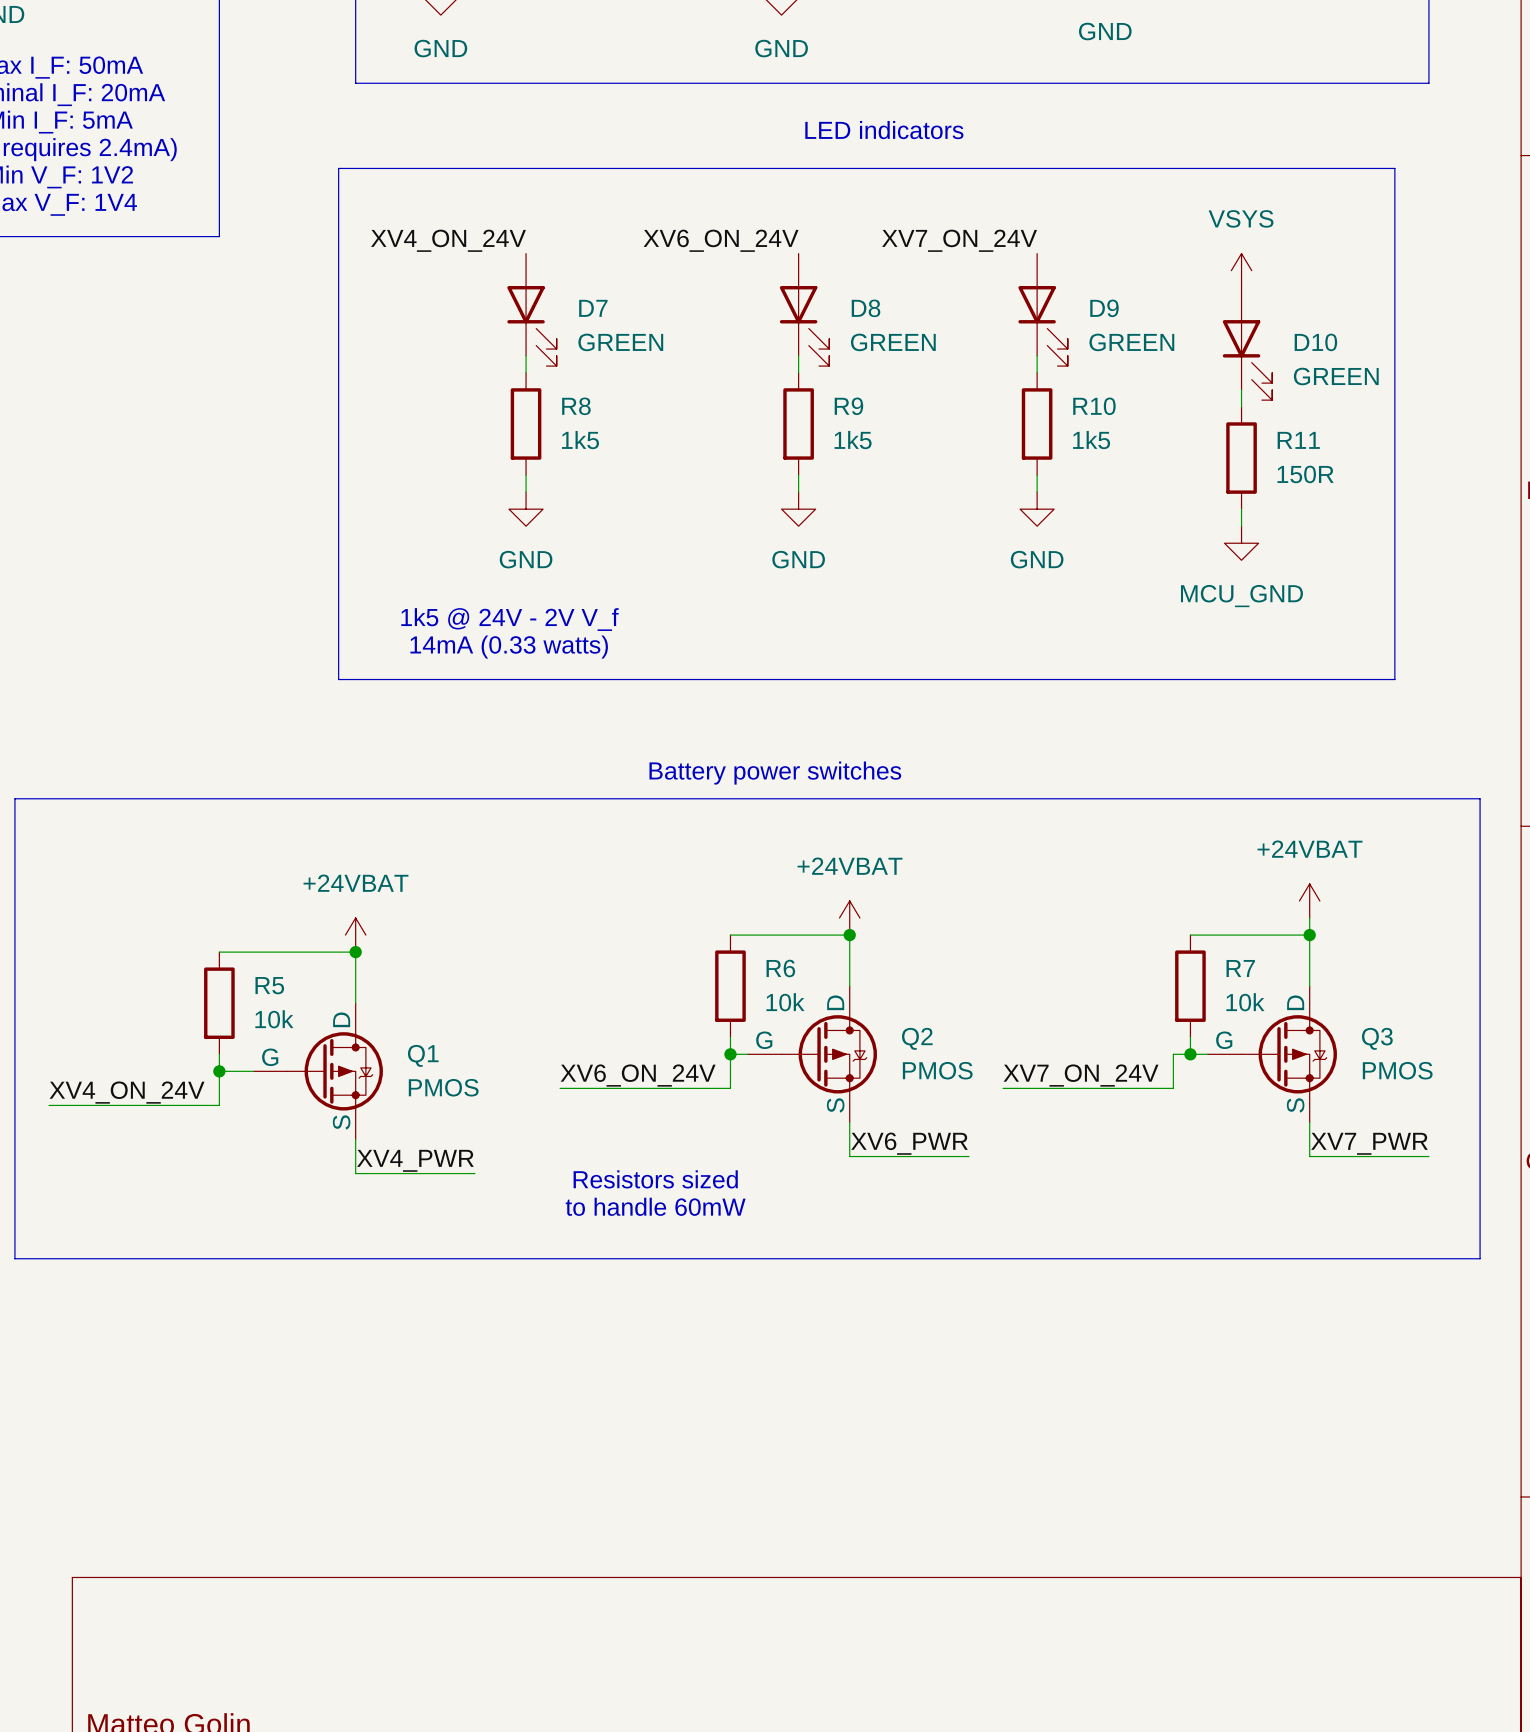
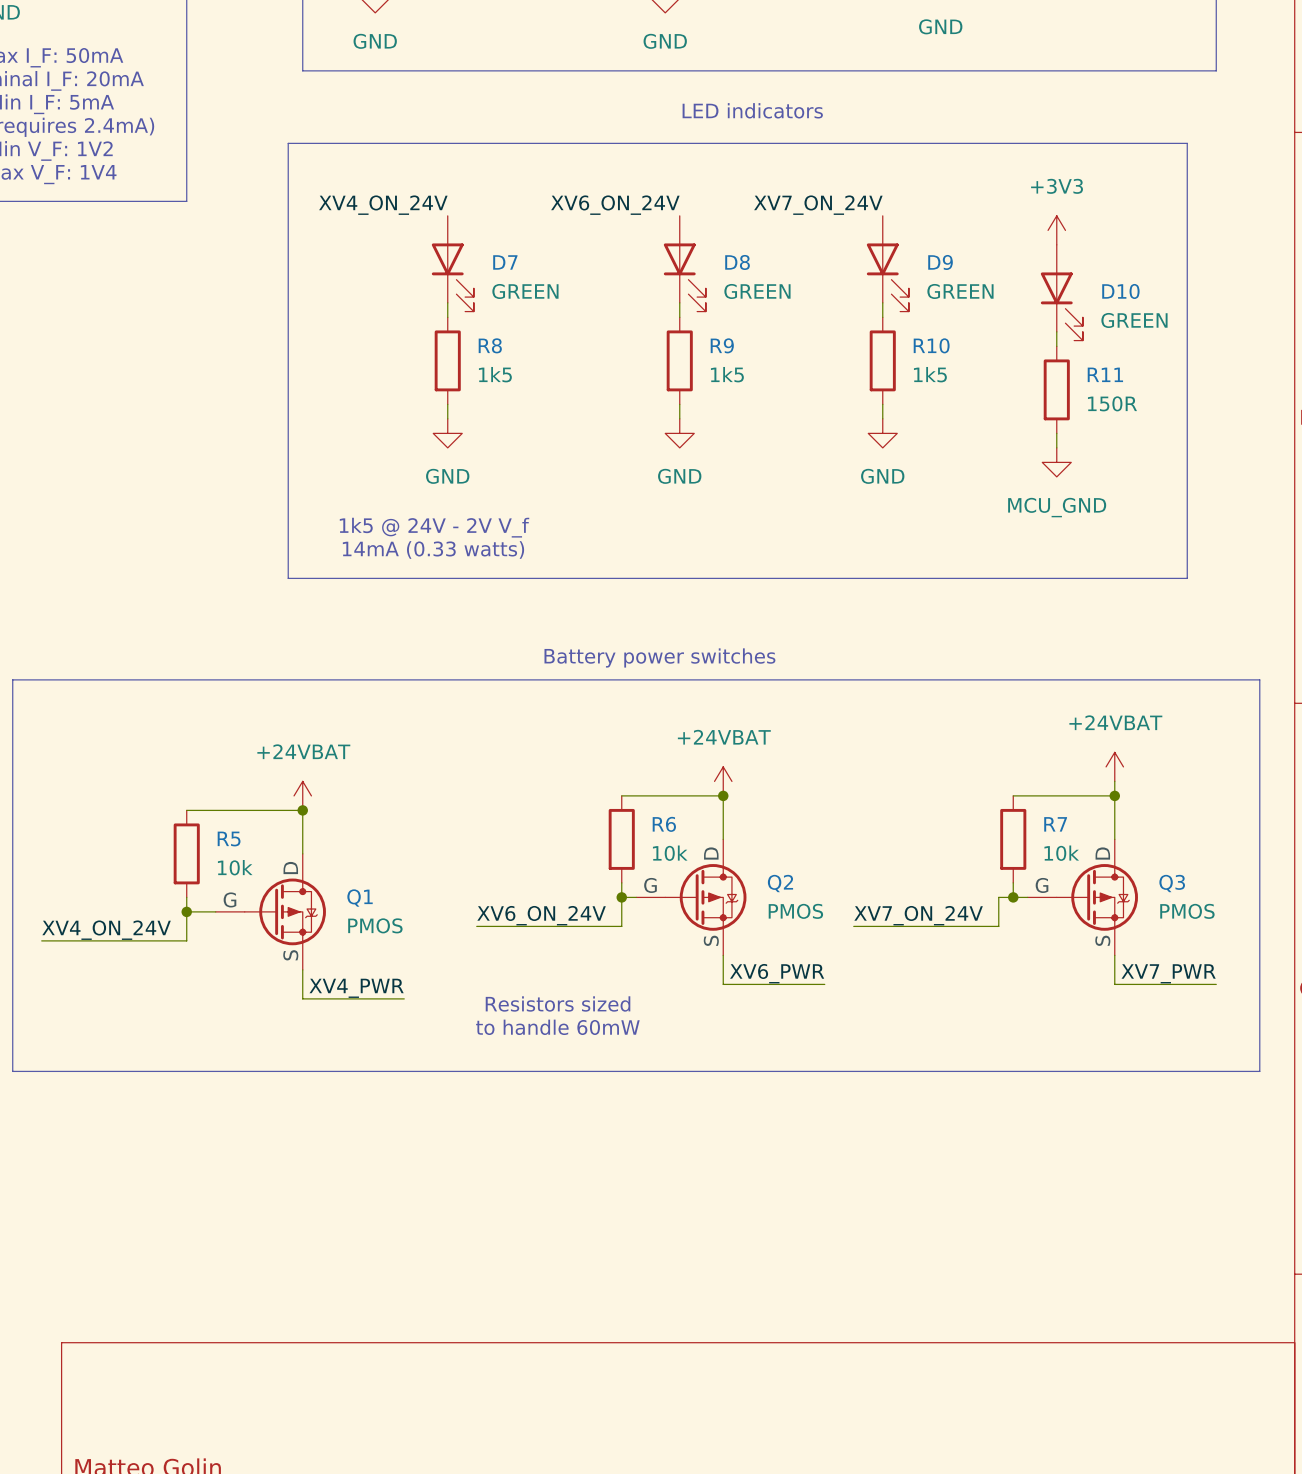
power symbol: VSYS (1241, 270) -> +3V3 (1056, 230)

